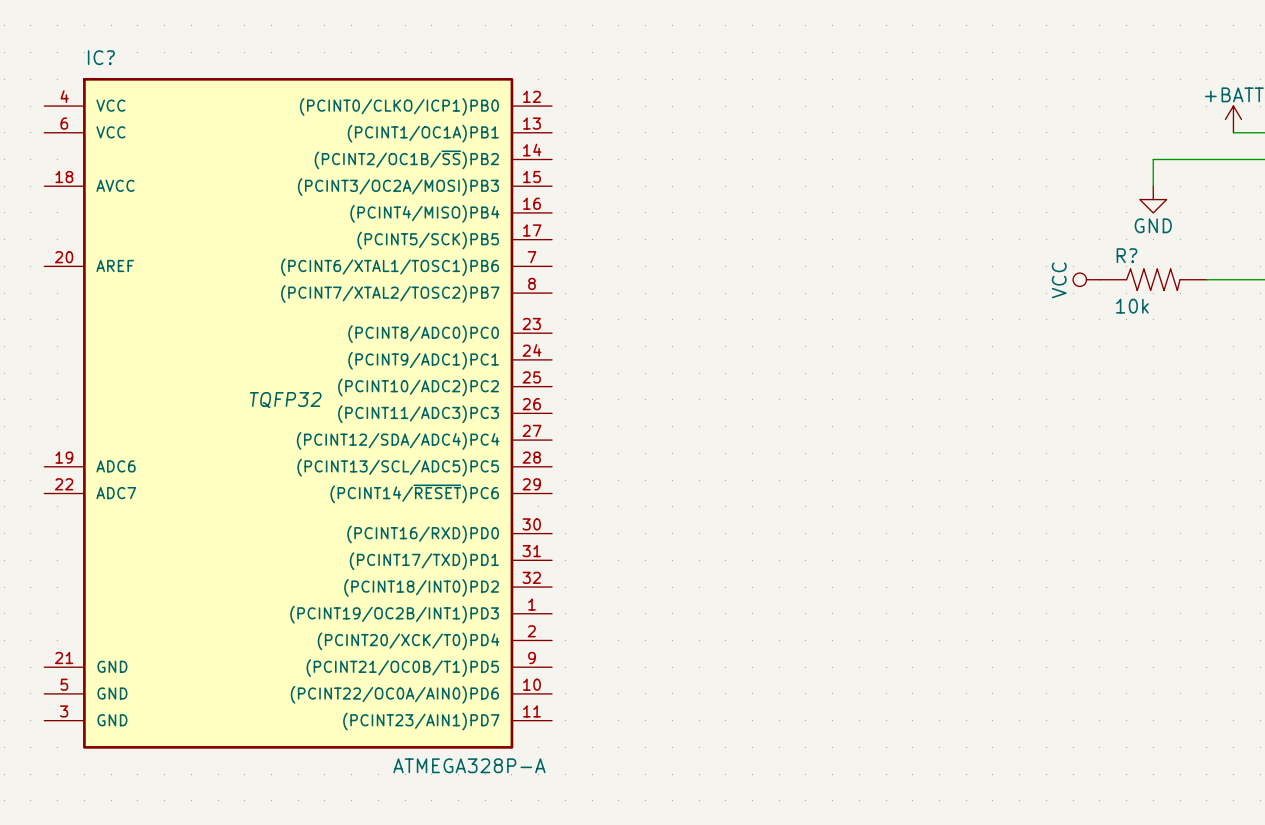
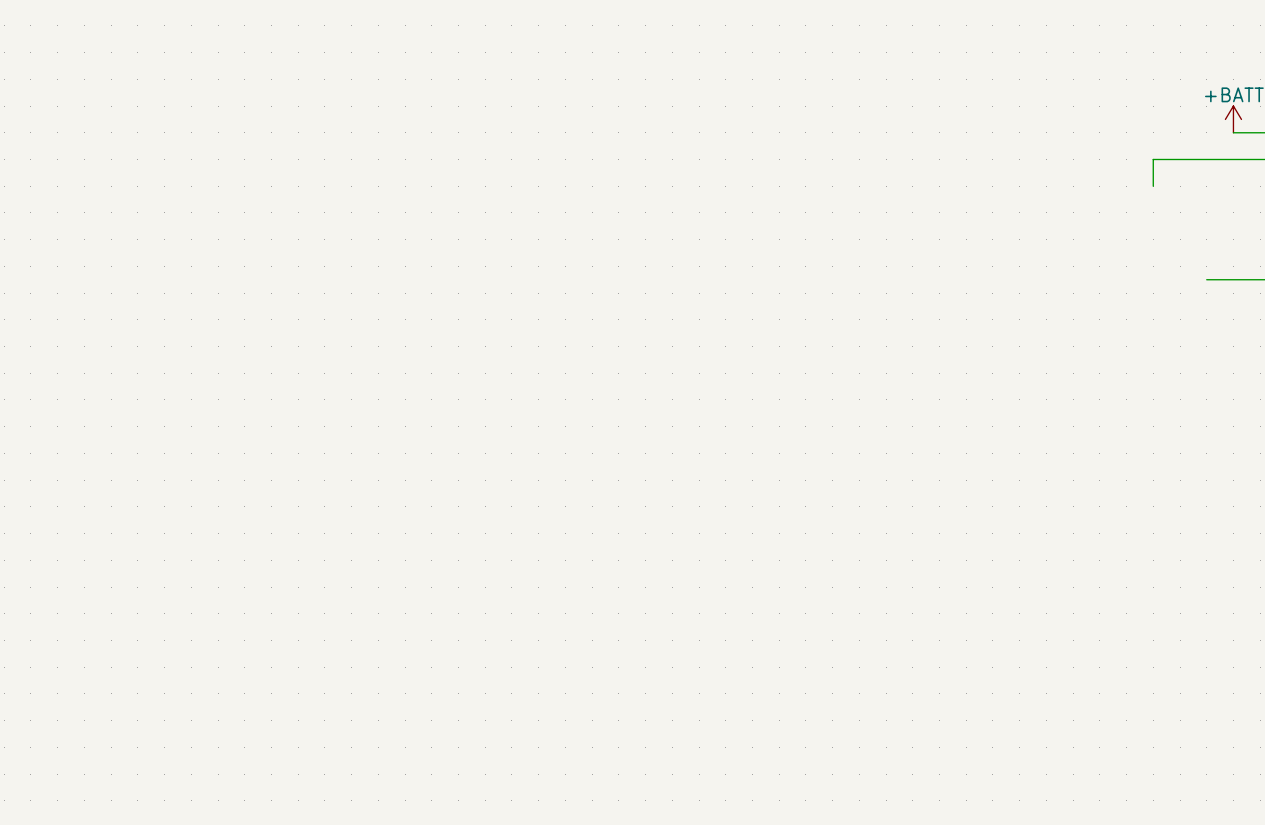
power symbol: GND (1153, 199) -> none
power symbol: VCC (1086, 279) -> none
R?: 10k (1153, 279) -> none
IC?: ATMEGA328P-A (298, 413) -> none

